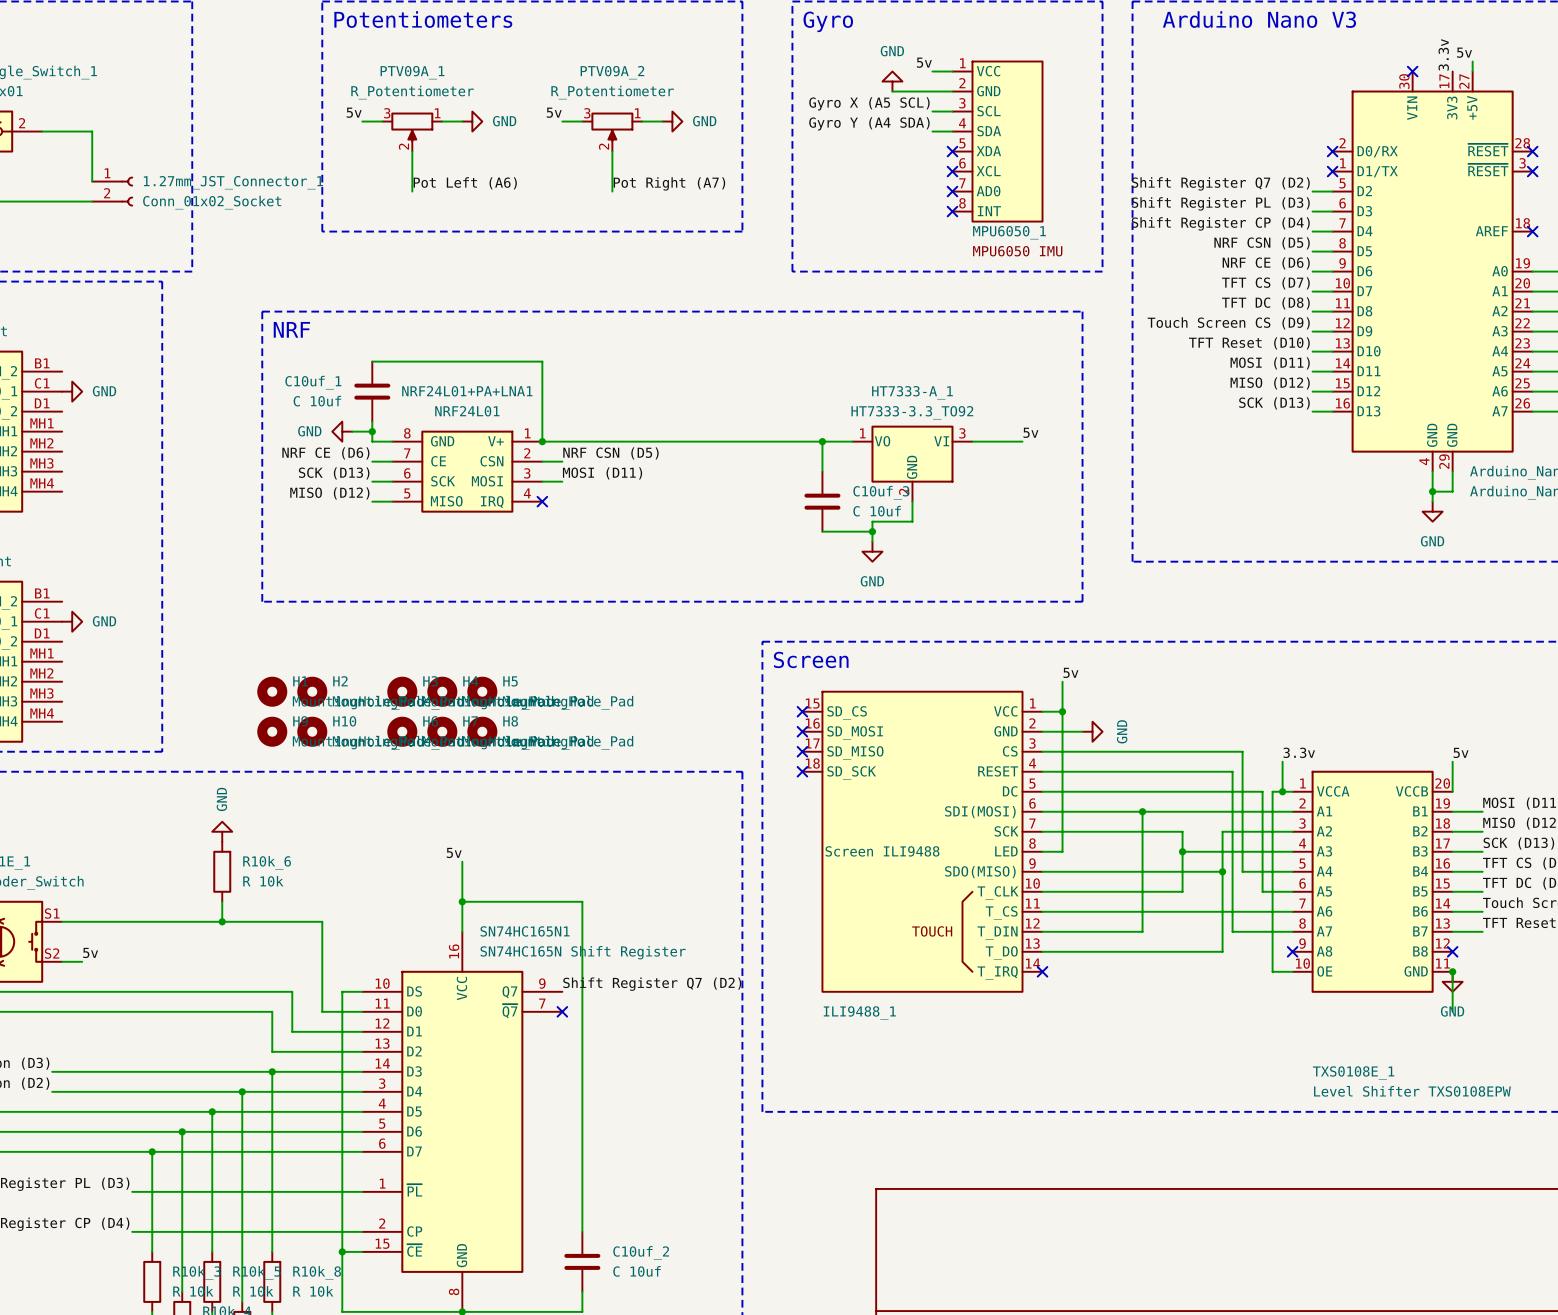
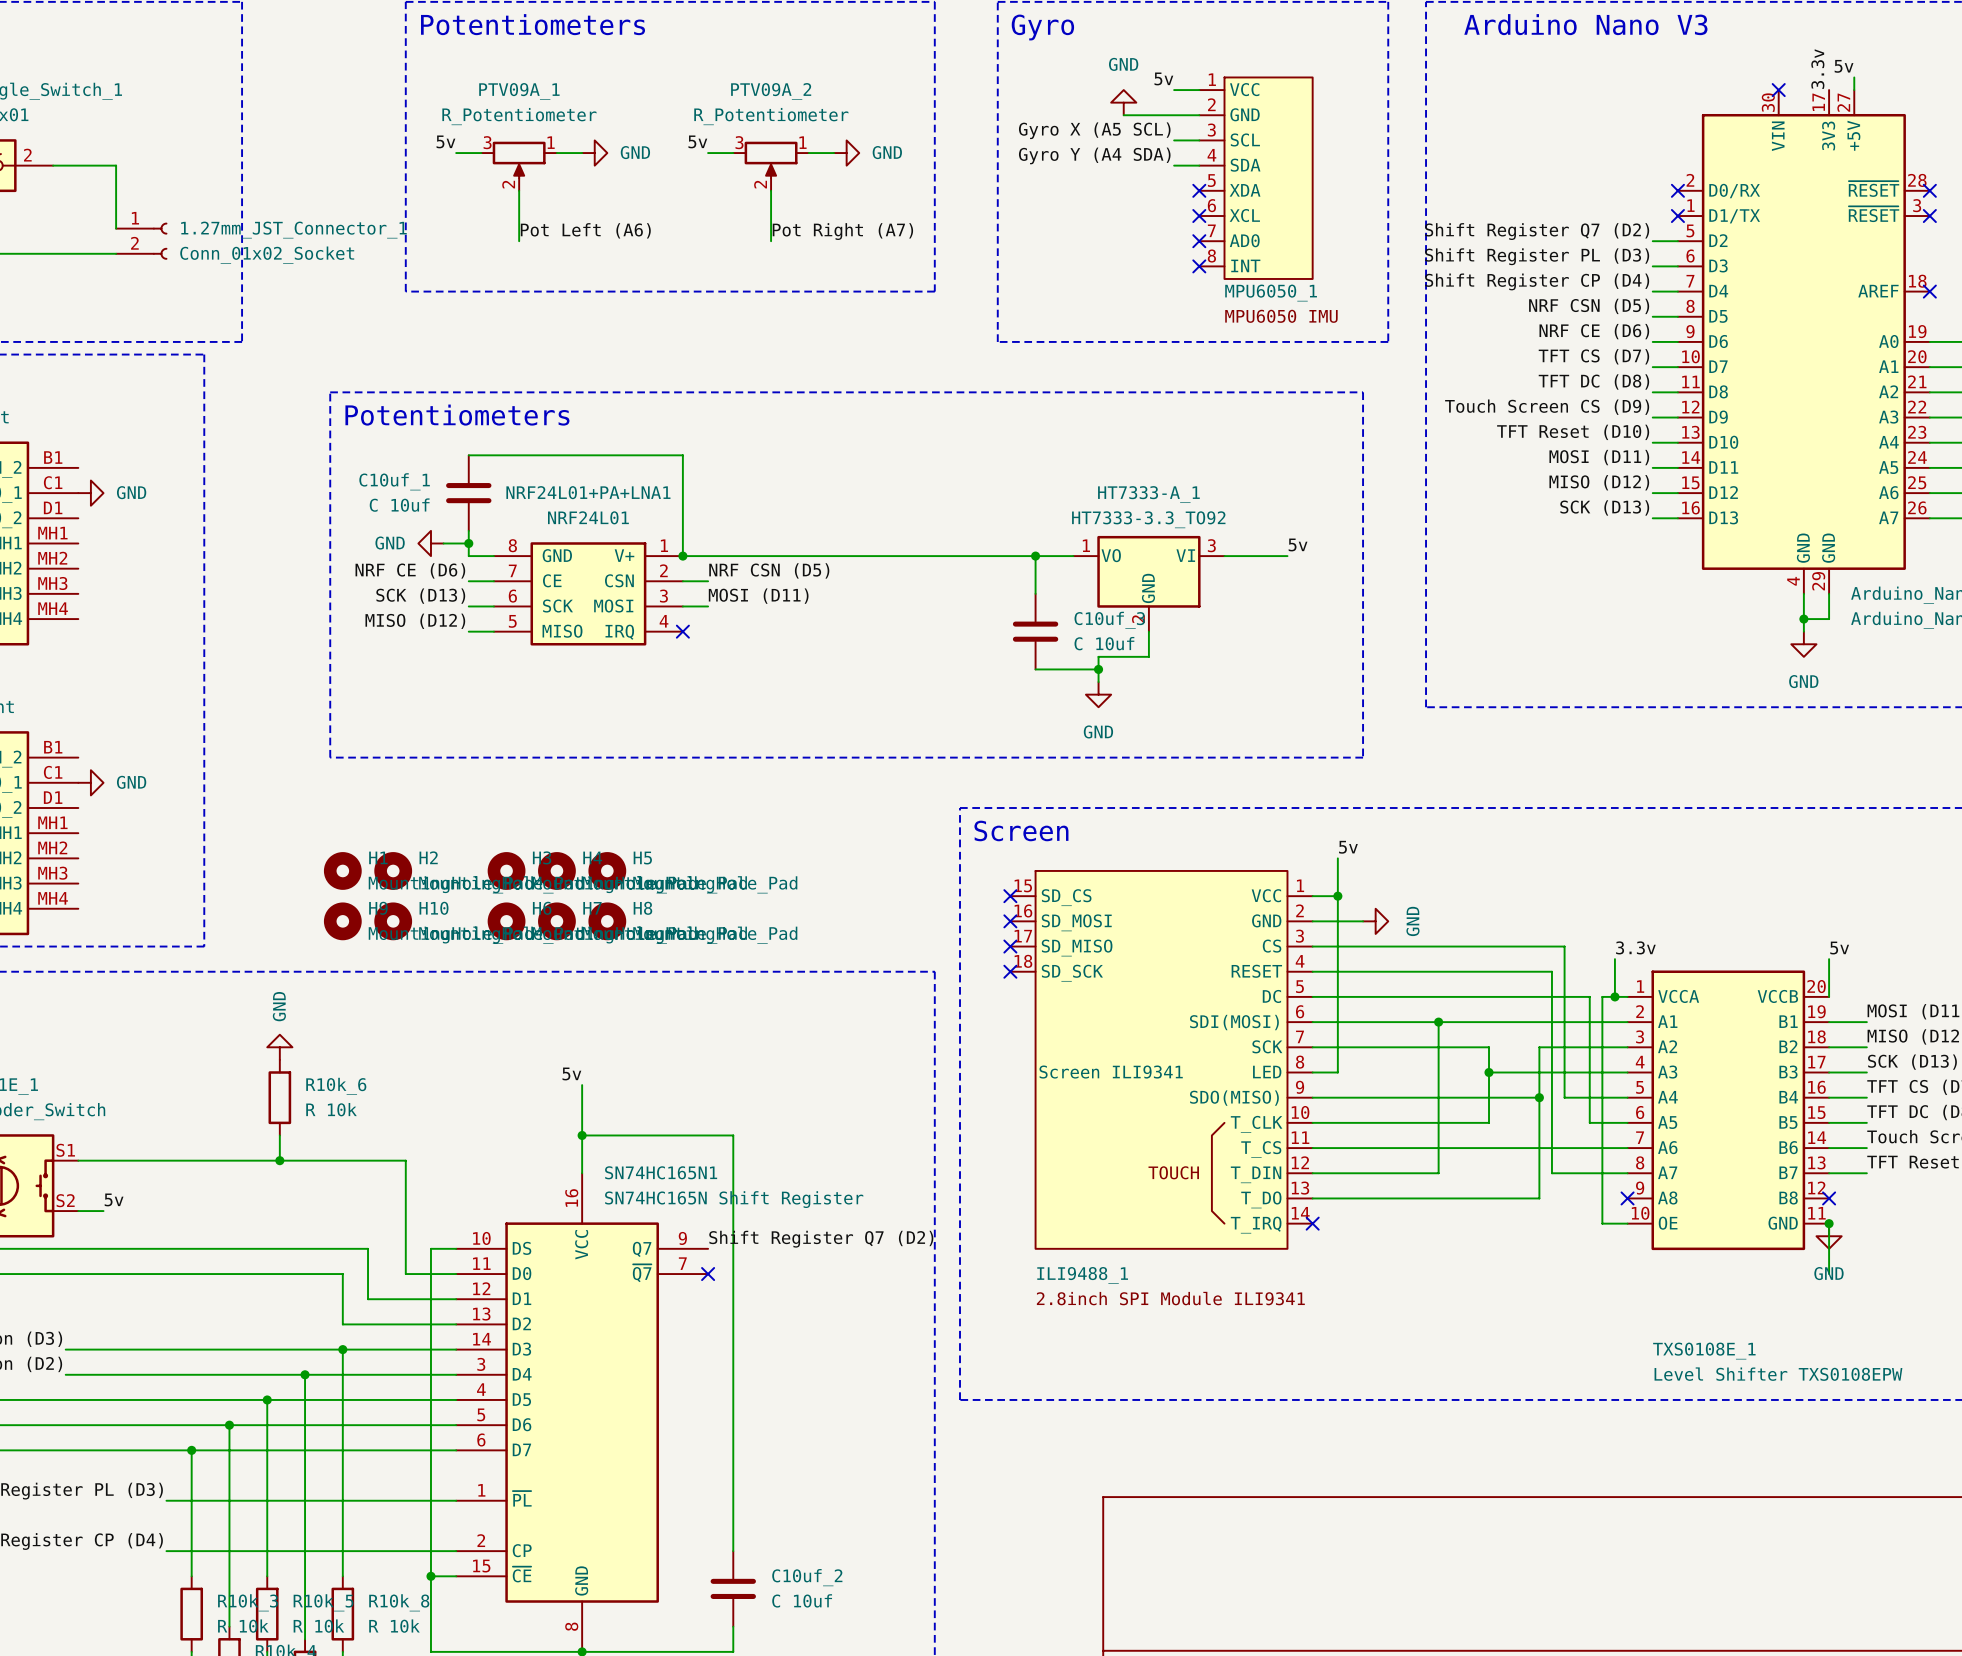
text: NRF (291, 329) -> Potentiometers (457, 415)
ILI9488_1 value: Screen ILI9488 (882, 851) -> Screen ILI9341 (1111, 1072)
ILI9488_1 text: none -> 2.8inch SPI Module ILI9341 (1170, 1298)

